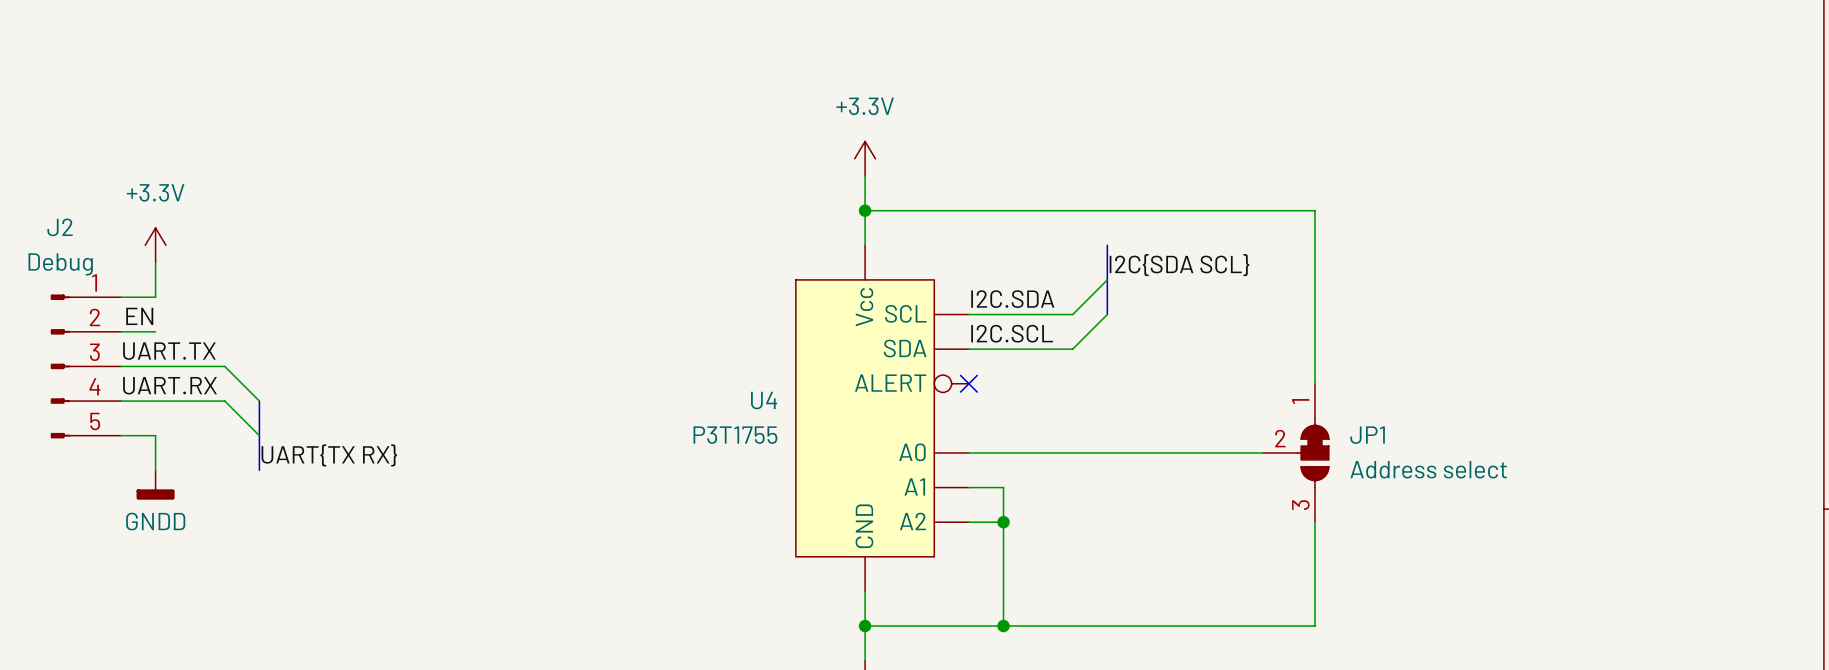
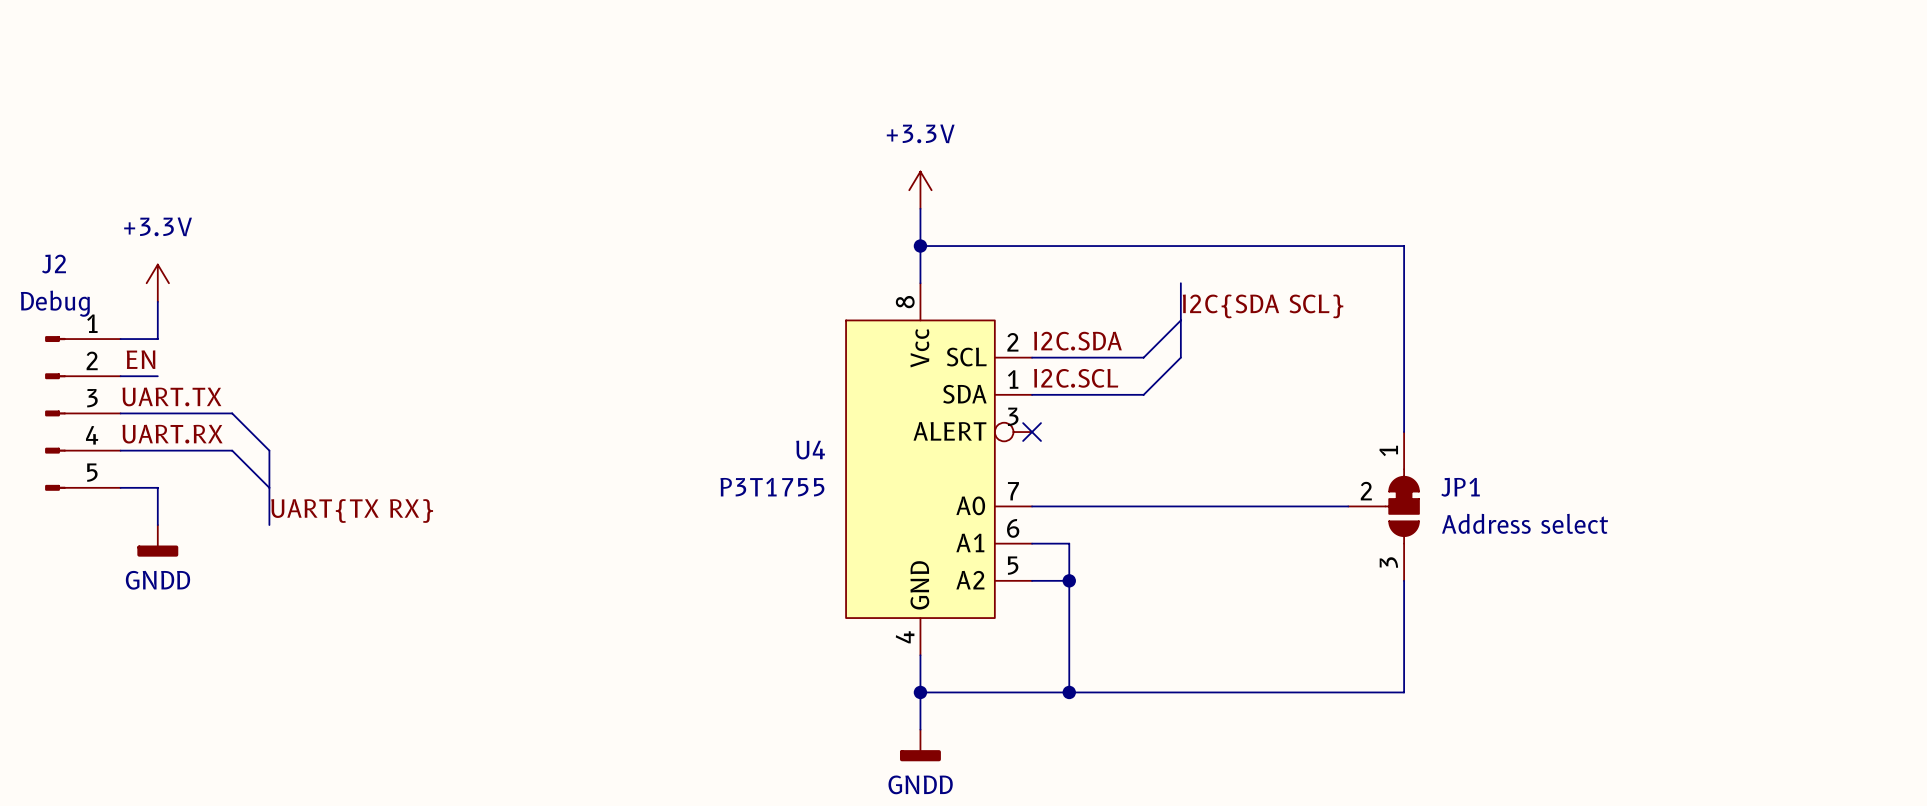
U4 symbol: [795, 245, 969, 592] -> [846, 283, 1033, 656]

